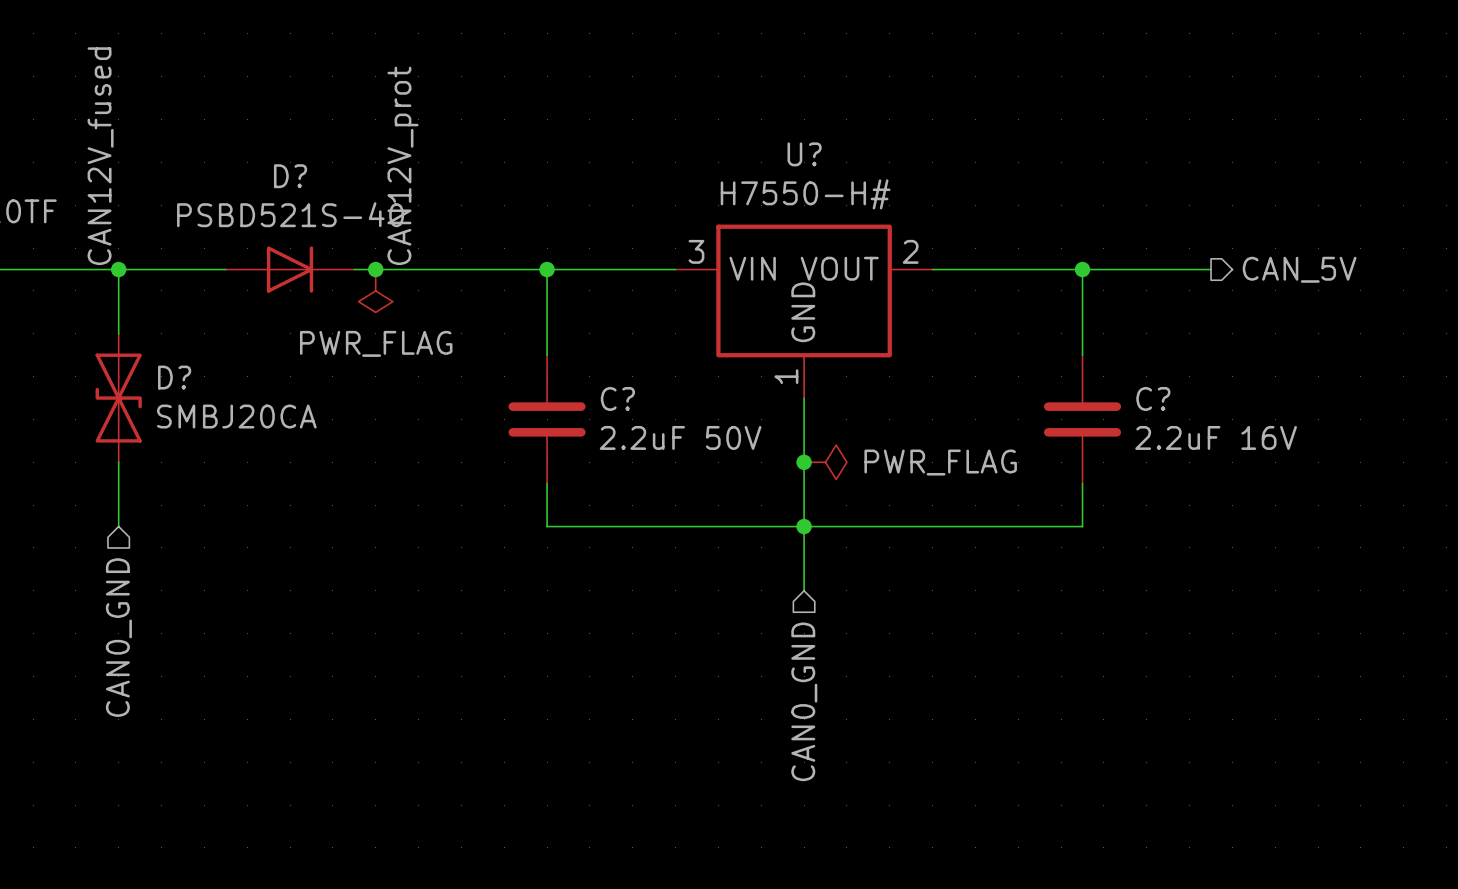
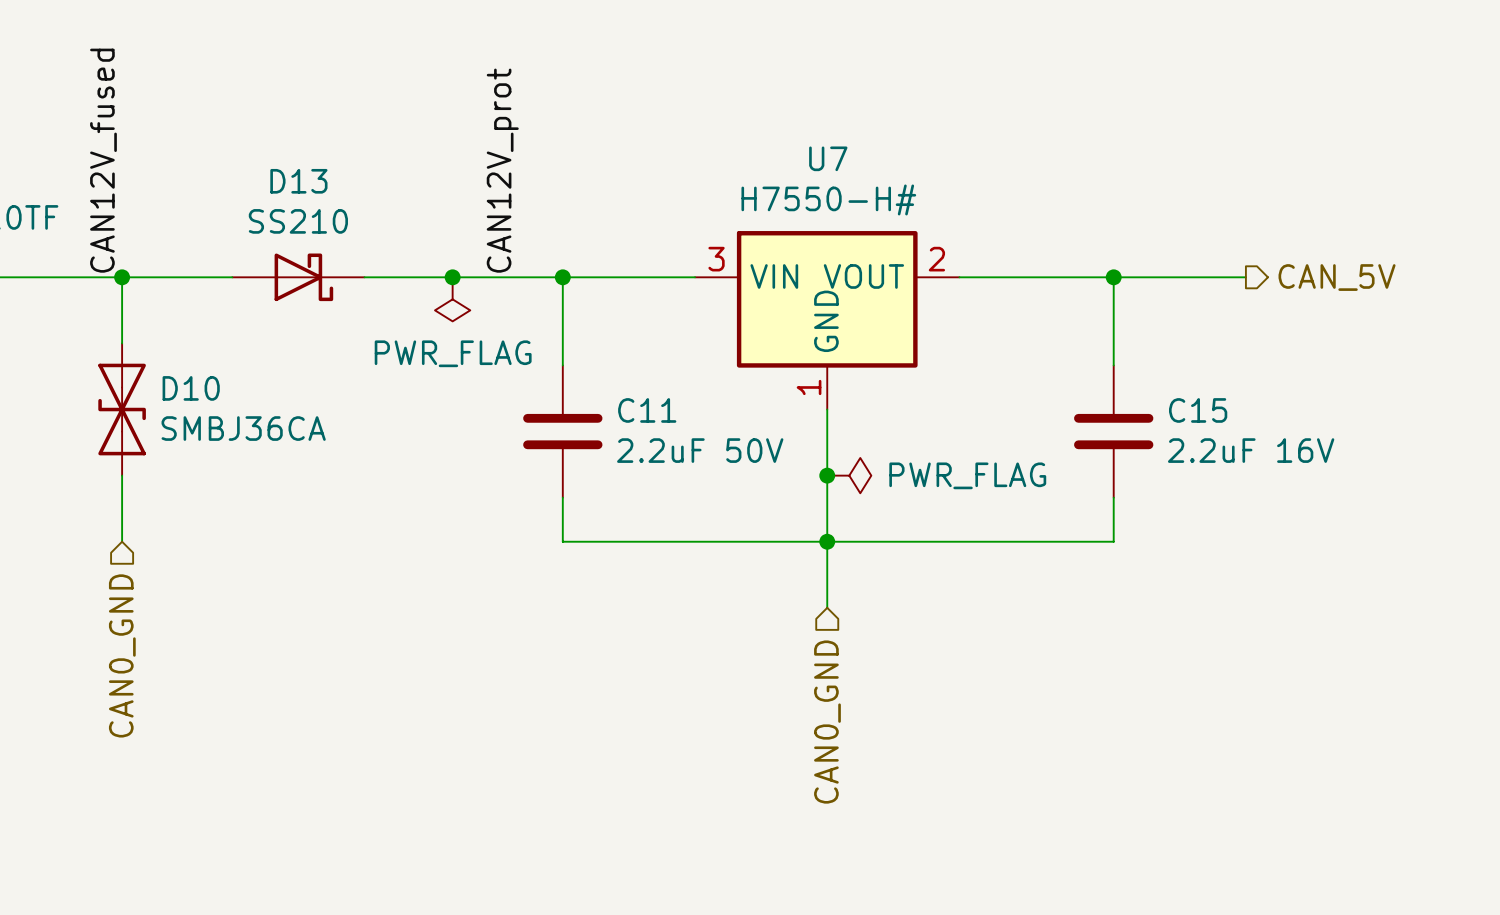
U? name: U? (804, 154) -> U7 (828, 158)
label position: CAN12V_prot (402, 165) -> CAN12V_prot (502, 170)
D?: PSBD521S-40 (290, 269) -> none
D13: none -> SS210 (298, 277)
junction position: (375, 269) -> (452, 277)
power symbol position: PWR_FLAG (375, 290) -> PWR_FLAG (452, 299)
D? name: D? (174, 377) -> D10 (191, 388)
C? name: C? (617, 398) -> C11 (647, 410)
C? name: C? (1153, 398) -> C15 (1198, 410)
D? value: SMBJ20CA (236, 416) -> SMBJ36CA (243, 428)

